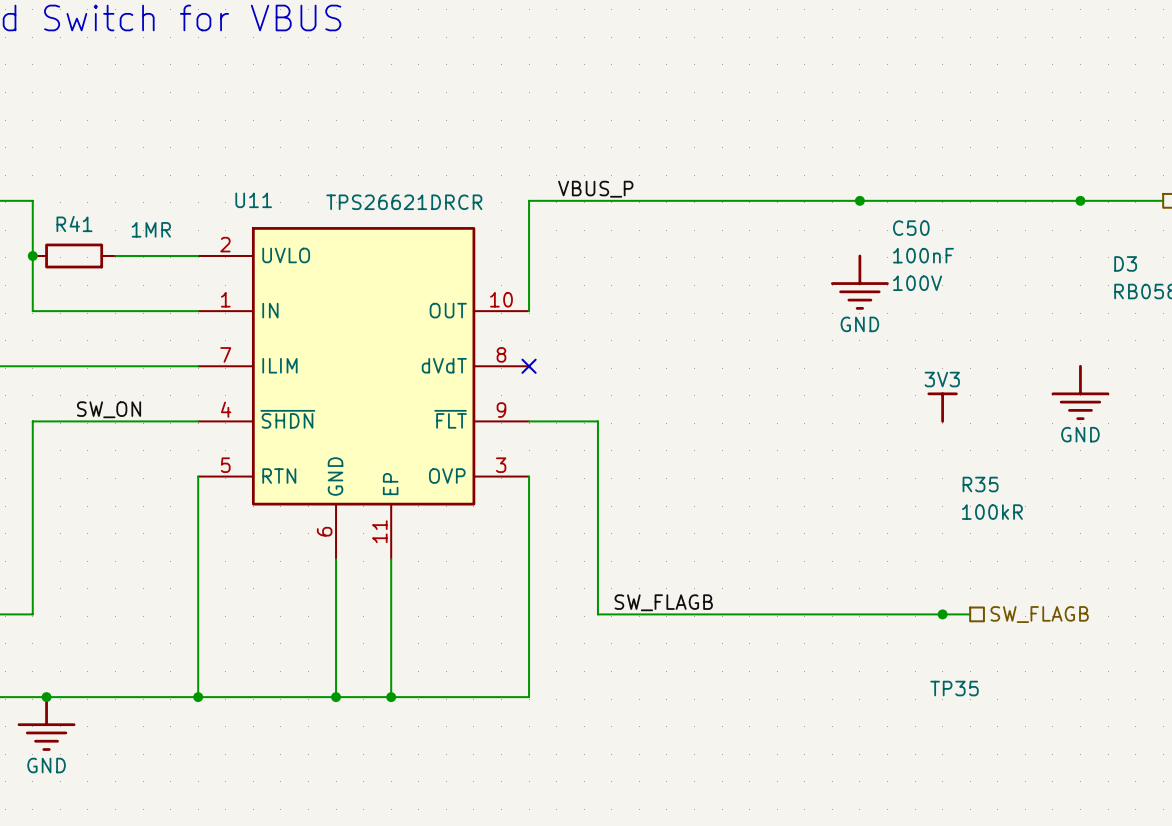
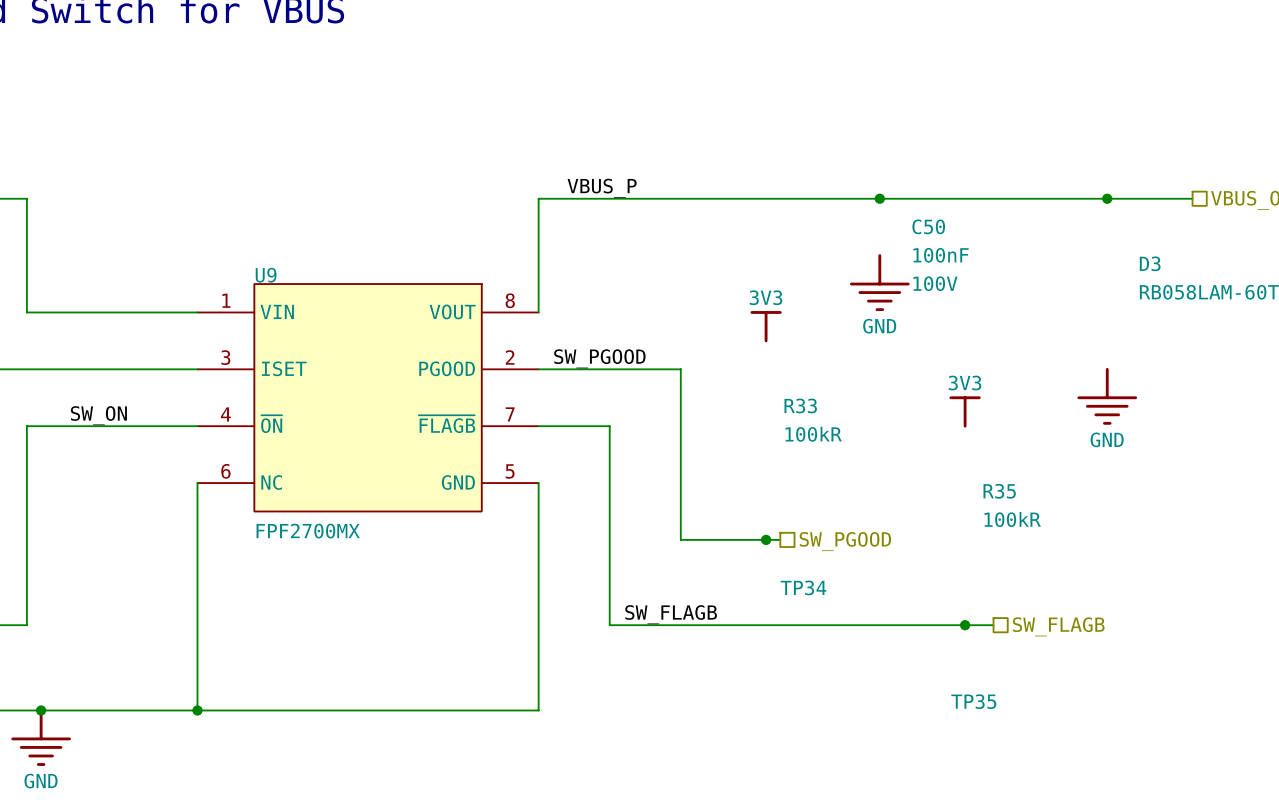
junction: (32, 255) -> none
R41: (74, 255) -> none
wire: (115, 255) (198, 255) -> none
power symbol: none -> 3V3 (766, 326)
label: none -> SW_PGOOD (599, 358)
wire: none -> (538, 369) (680, 369) (680, 539) (780, 539)
no-connect mark: (529, 366) -> none
U11: TPS26621DRCR (363, 393) -> none
U9: none -> FPF2700MX (368, 397)
R33: none -> (813, 420)
junction: none -> (766, 539)
hierarchical label: none -> SW_PGOOD (845, 541)
wire: (336, 559) (336, 697) -> none
wire: (391, 559) (391, 697) -> none
TP34: none -> (803, 587)
junction: (336, 697) -> none
junction: (391, 697) -> none

